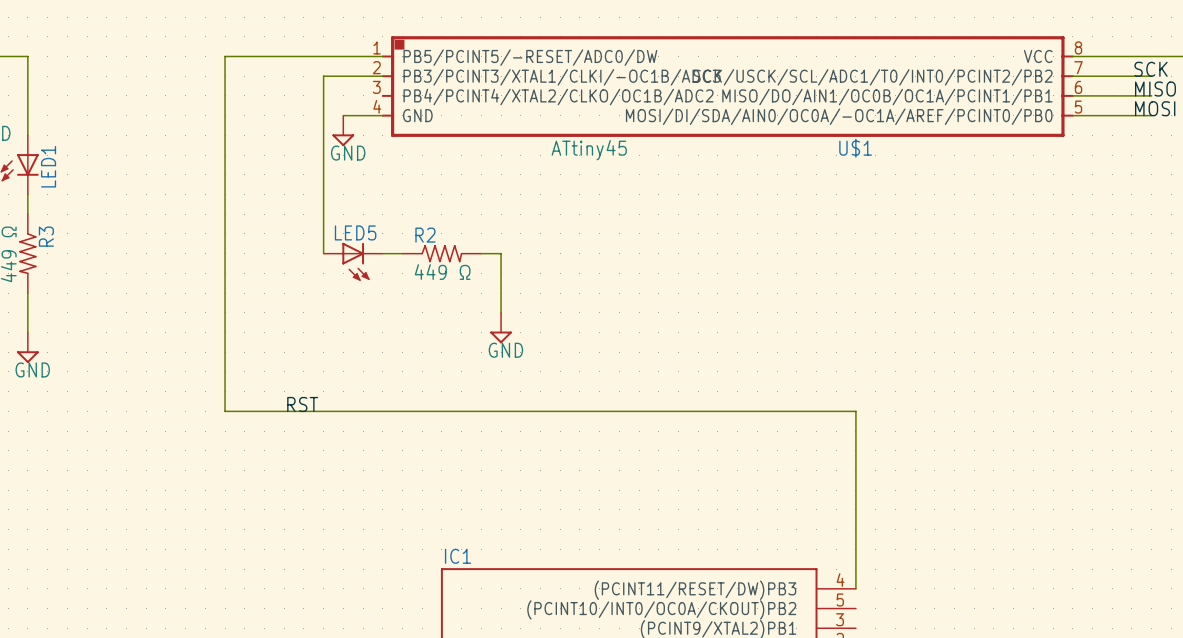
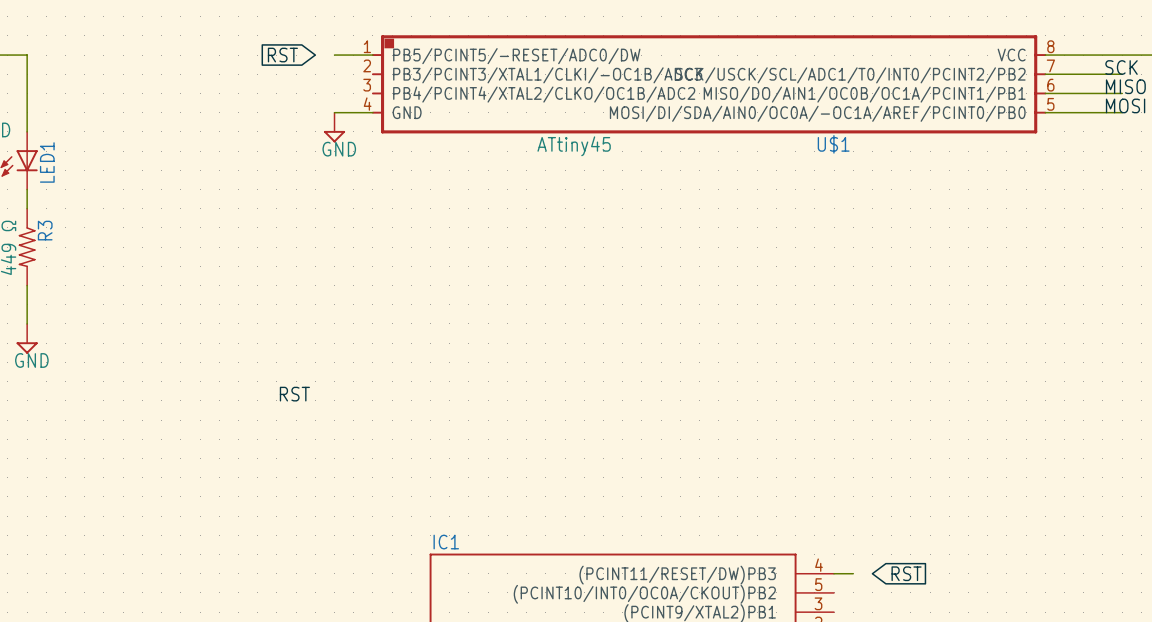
global label: none -> RST (282, 55)
wire: (343, 56) (225, 56) (225, 411) (855, 411) (855, 588) -> (853, 573) (834, 573)
wire: (382, 76) (323, 76) (323, 253) -> none
wire: (382, 253) (402, 253) -> none
R2: 449 Ω (441, 253) -> none
wire: (481, 253) (501, 253) (501, 312) -> none
LED5: (353, 261) -> none
power symbol: GND (501, 328) -> none
global label: none -> RST (906, 573)

